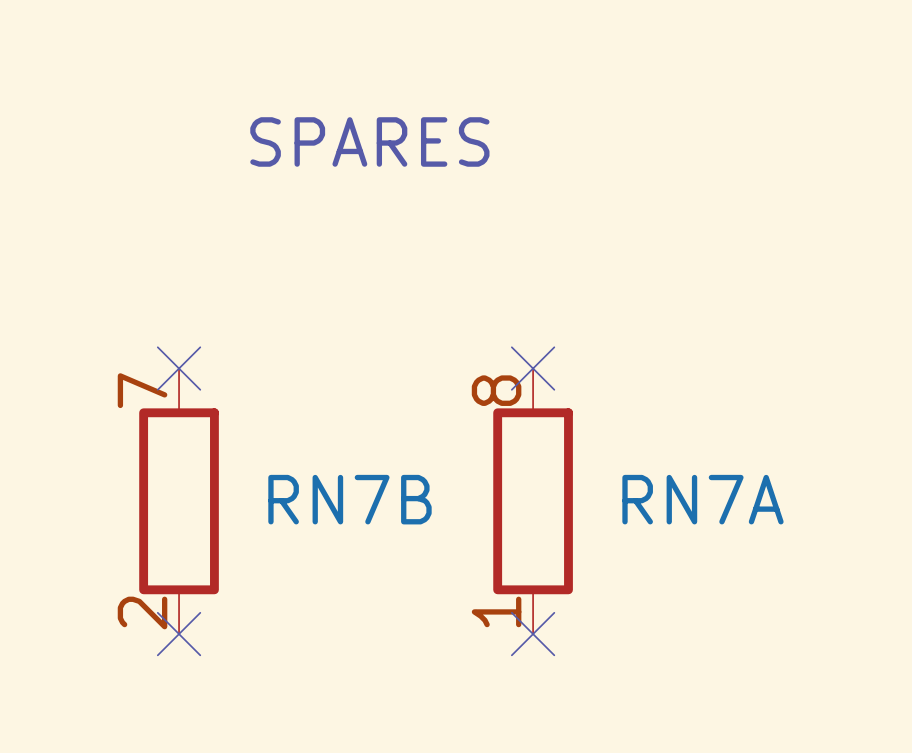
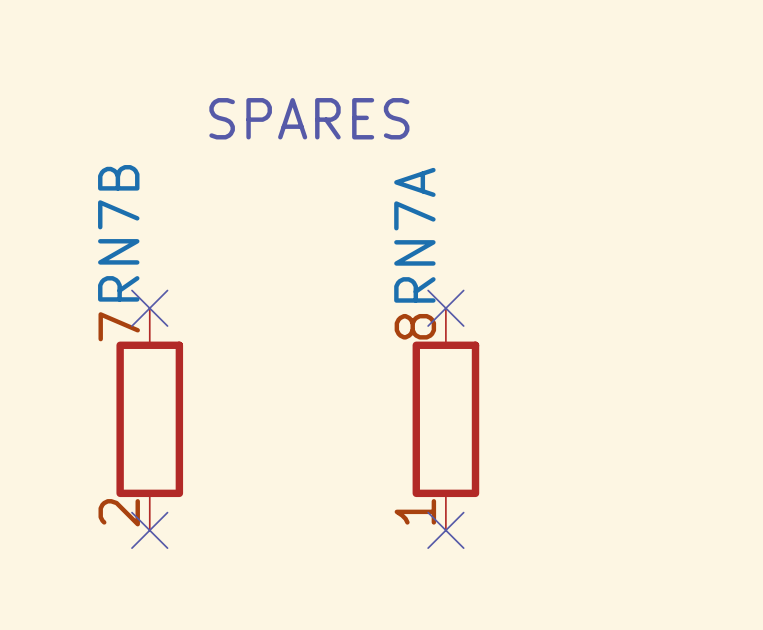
RN7B name rotation: 0° (349, 499) -> 90° counterclockwise (118, 233)
RN7B name position: RN7B (349, 499) -> RN7B (118, 233)
RN7A name rotation: 0° (702, 499) -> 90° counterclockwise (414, 235)
RN7A name position: RN7A (702, 499) -> RN7A (414, 235)

